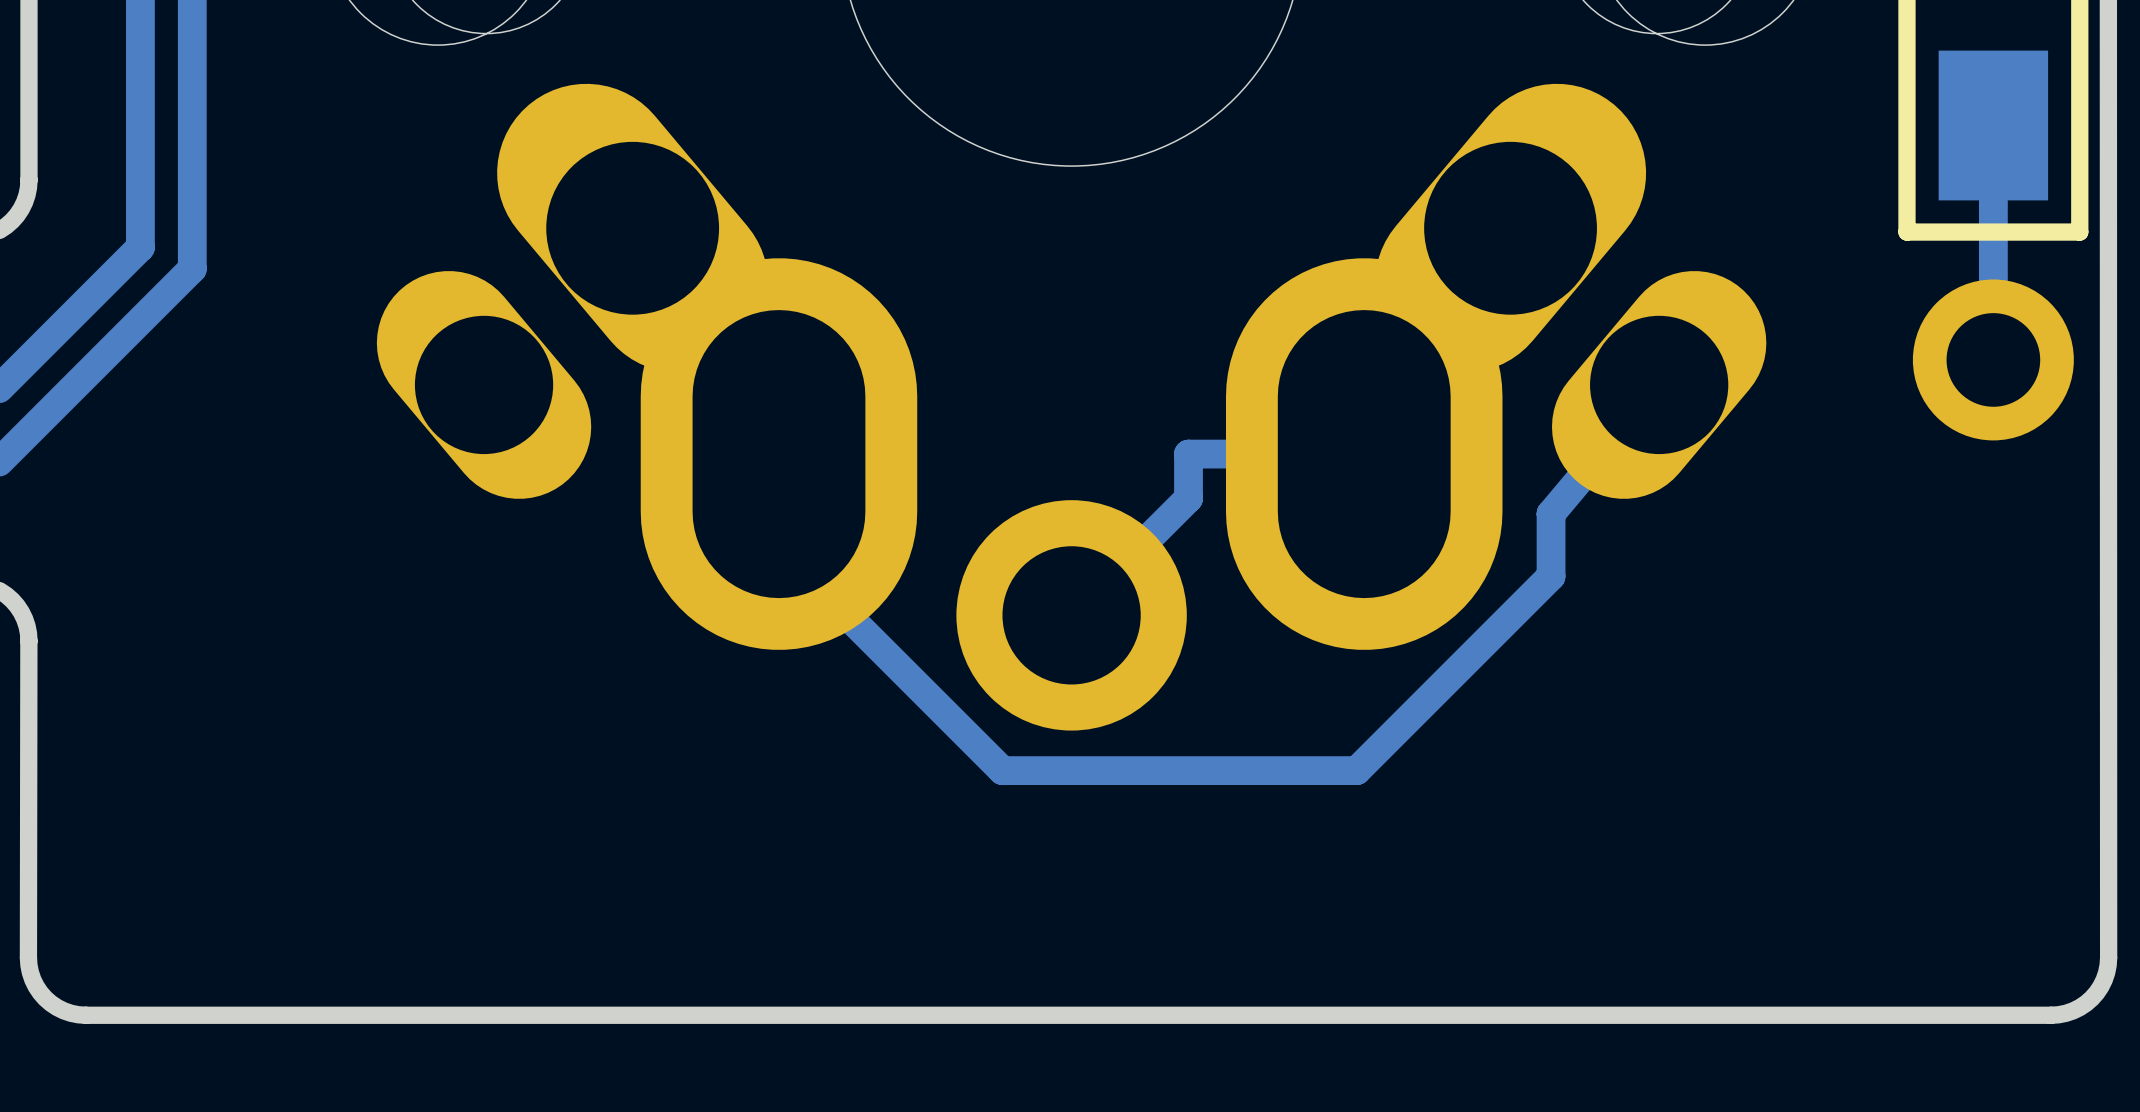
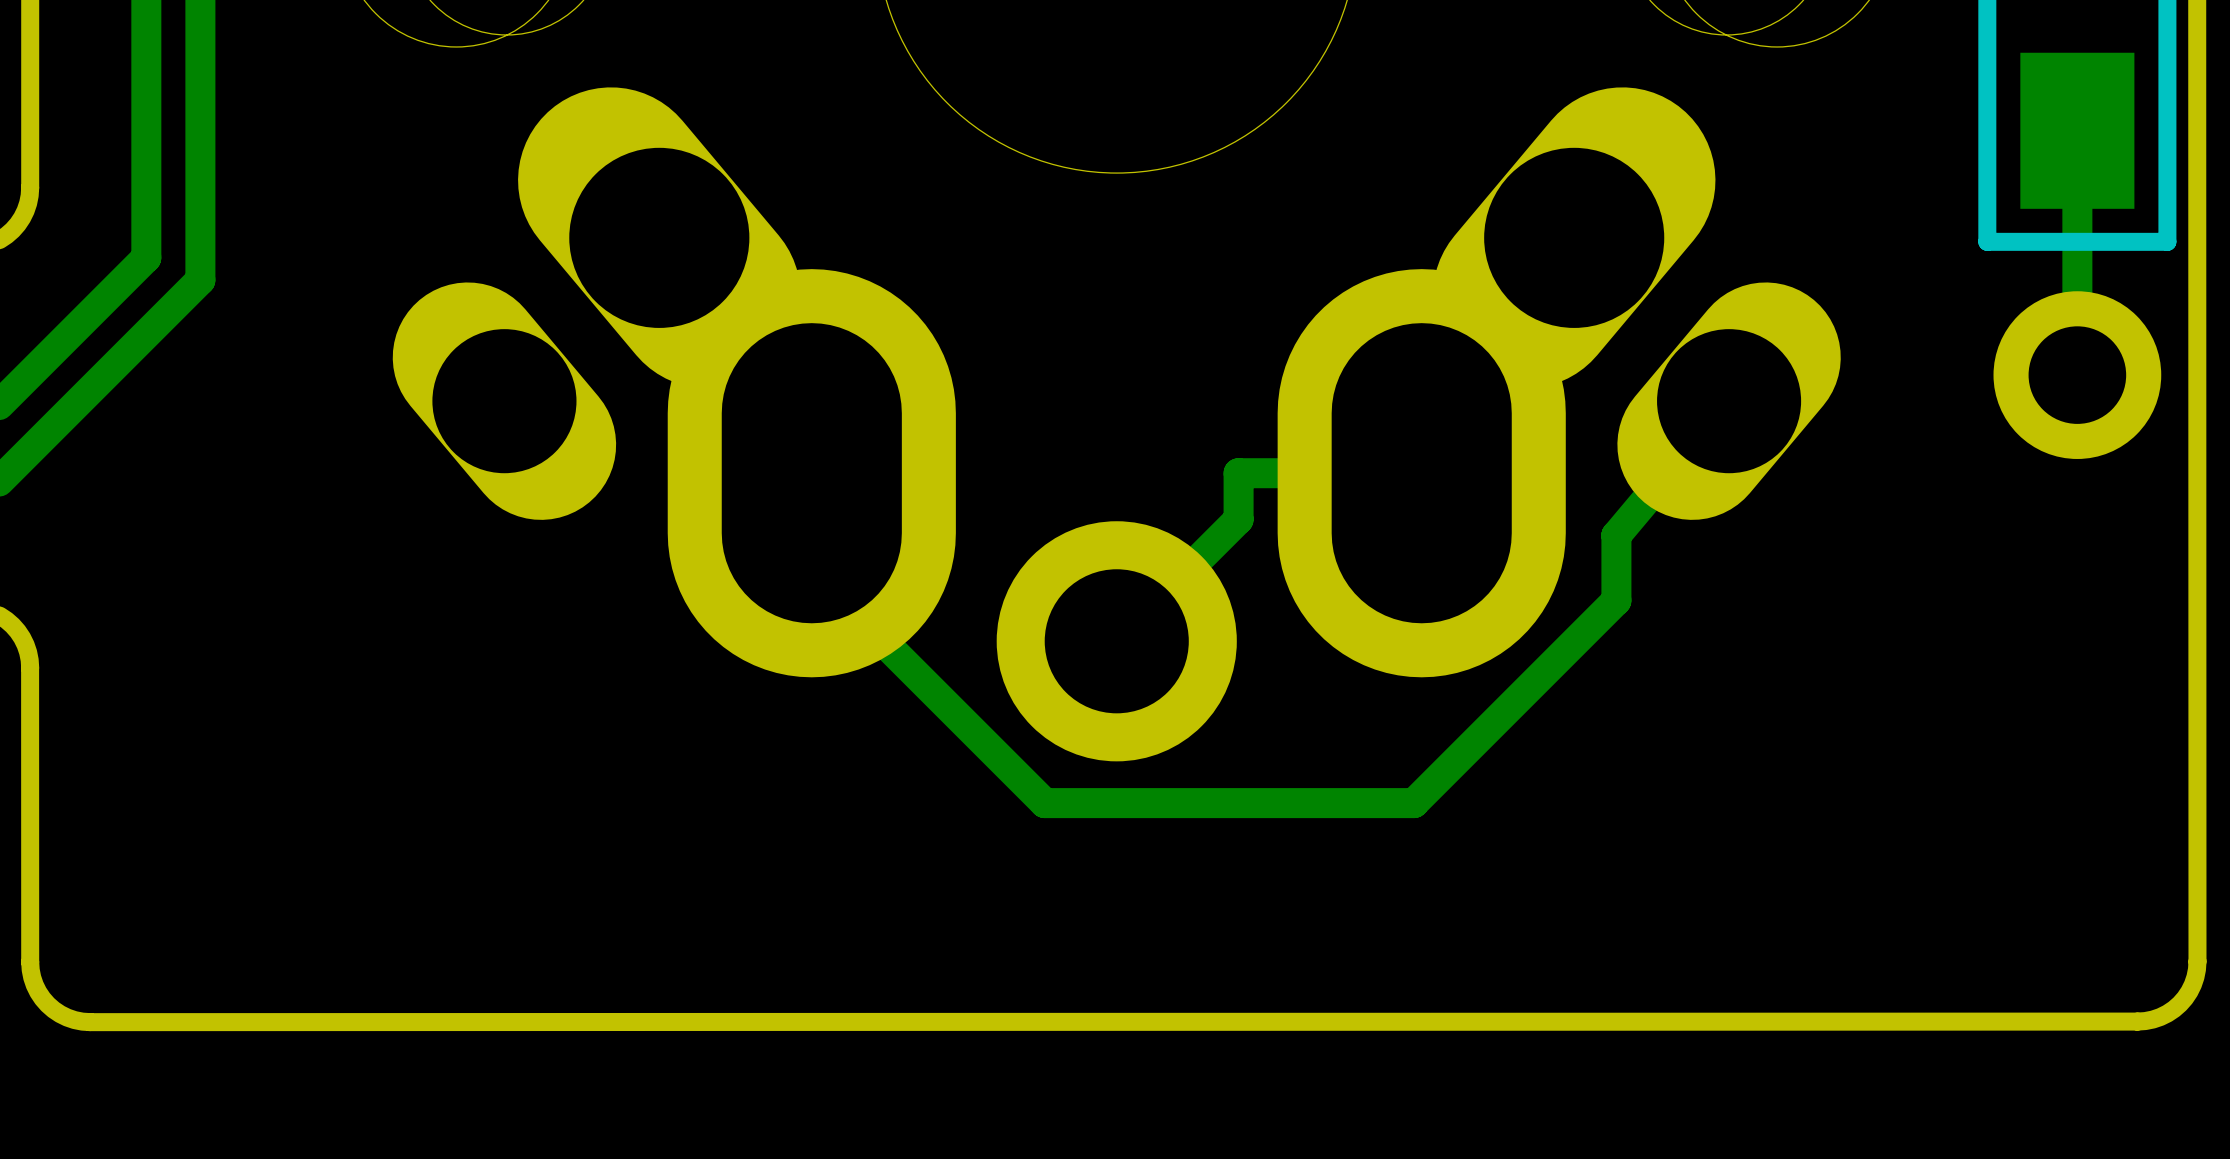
board edge: (28, 640) (28, 965) (32, 979) (45, 998) (57, 1007) (78, 1014) (2051, 1015) (2065, 1013) (2079, 1007) (2091, 998) (2100, 986) (2108, 965) (2108, 922) -> (30, 667) (30, 969) (34, 985) (47, 1004) (60, 1014) (82, 1021) (2137, 1021) (2160, 1017) (2179, 1003) (2192, 984) (2197, 961)

